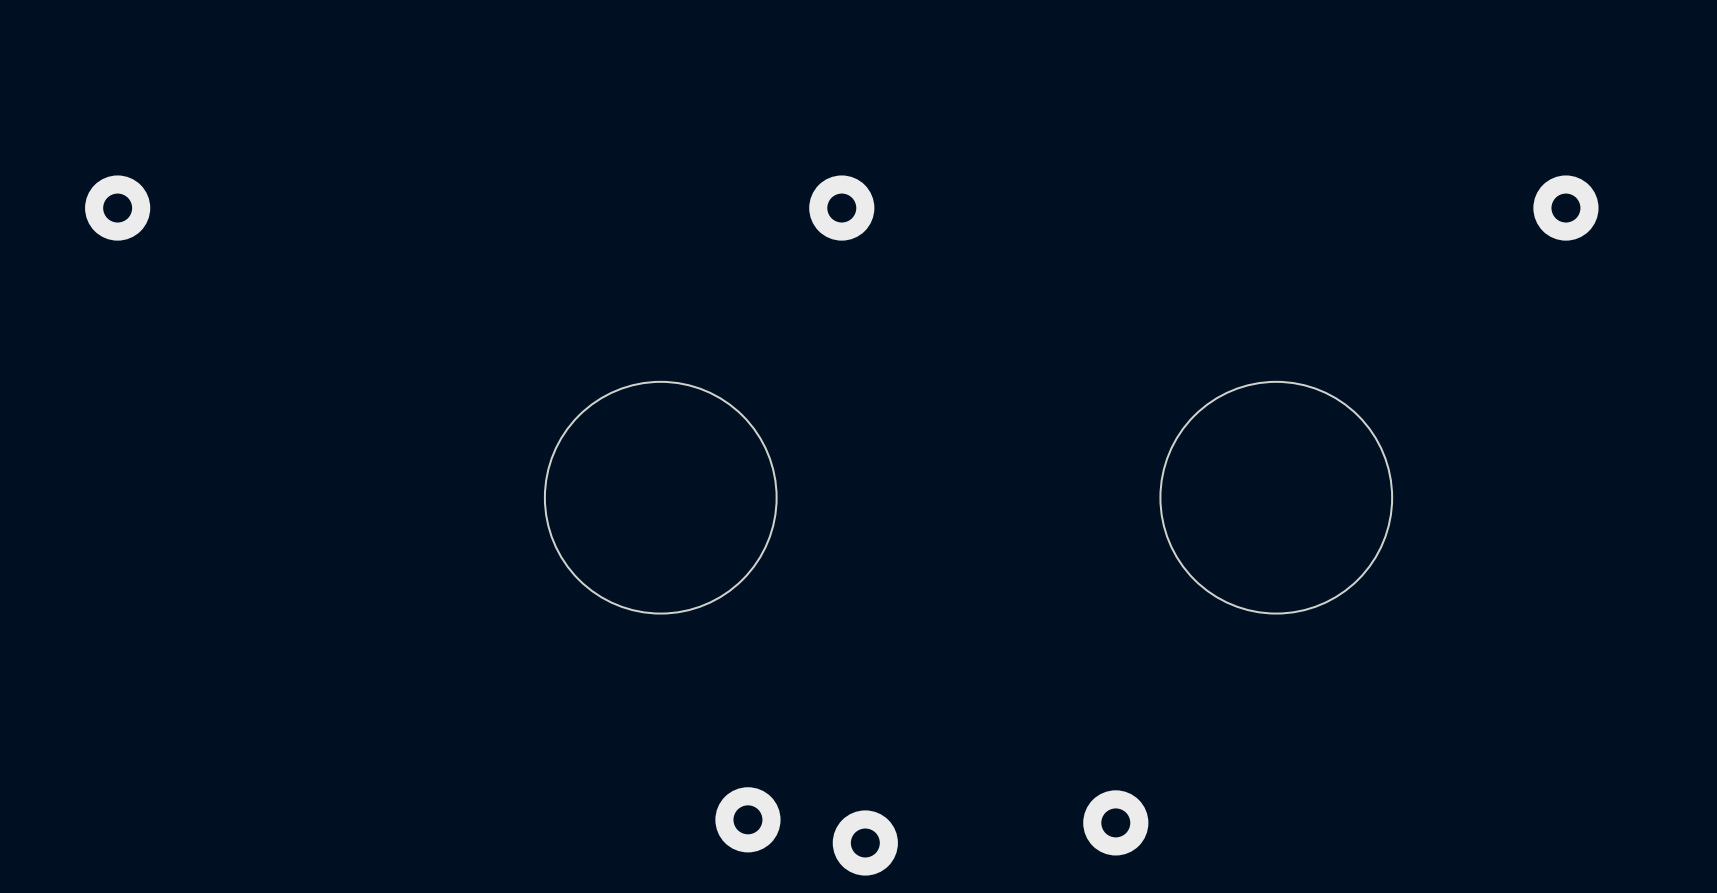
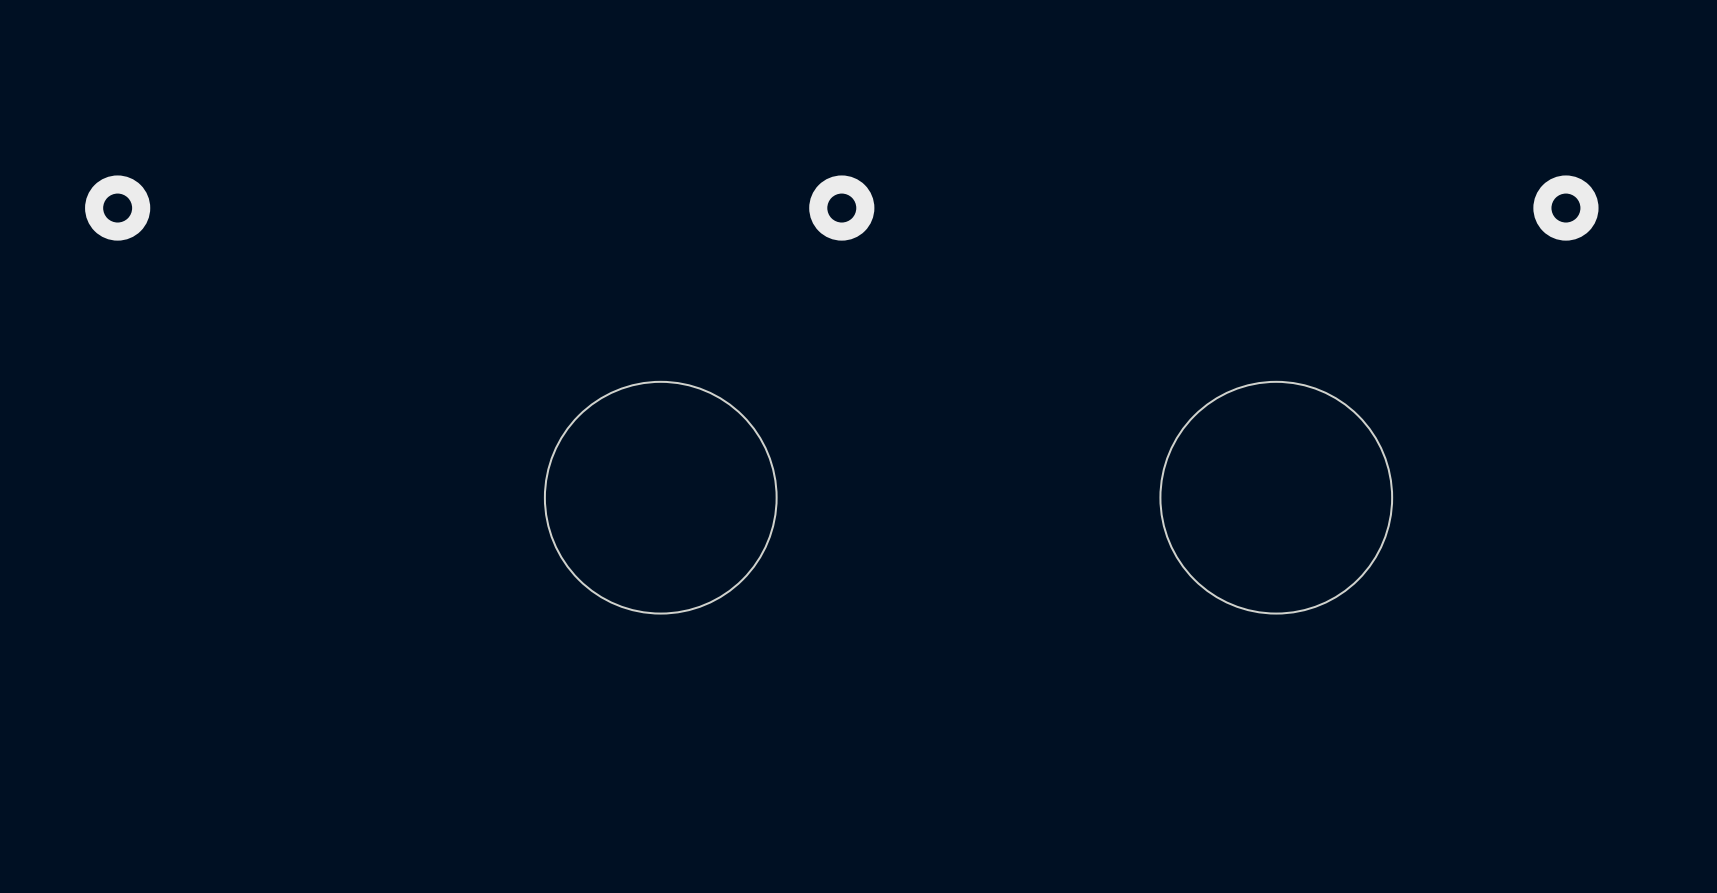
via: (747, 819) -> none
via: (1115, 822) -> none
via: (865, 842) -> none

